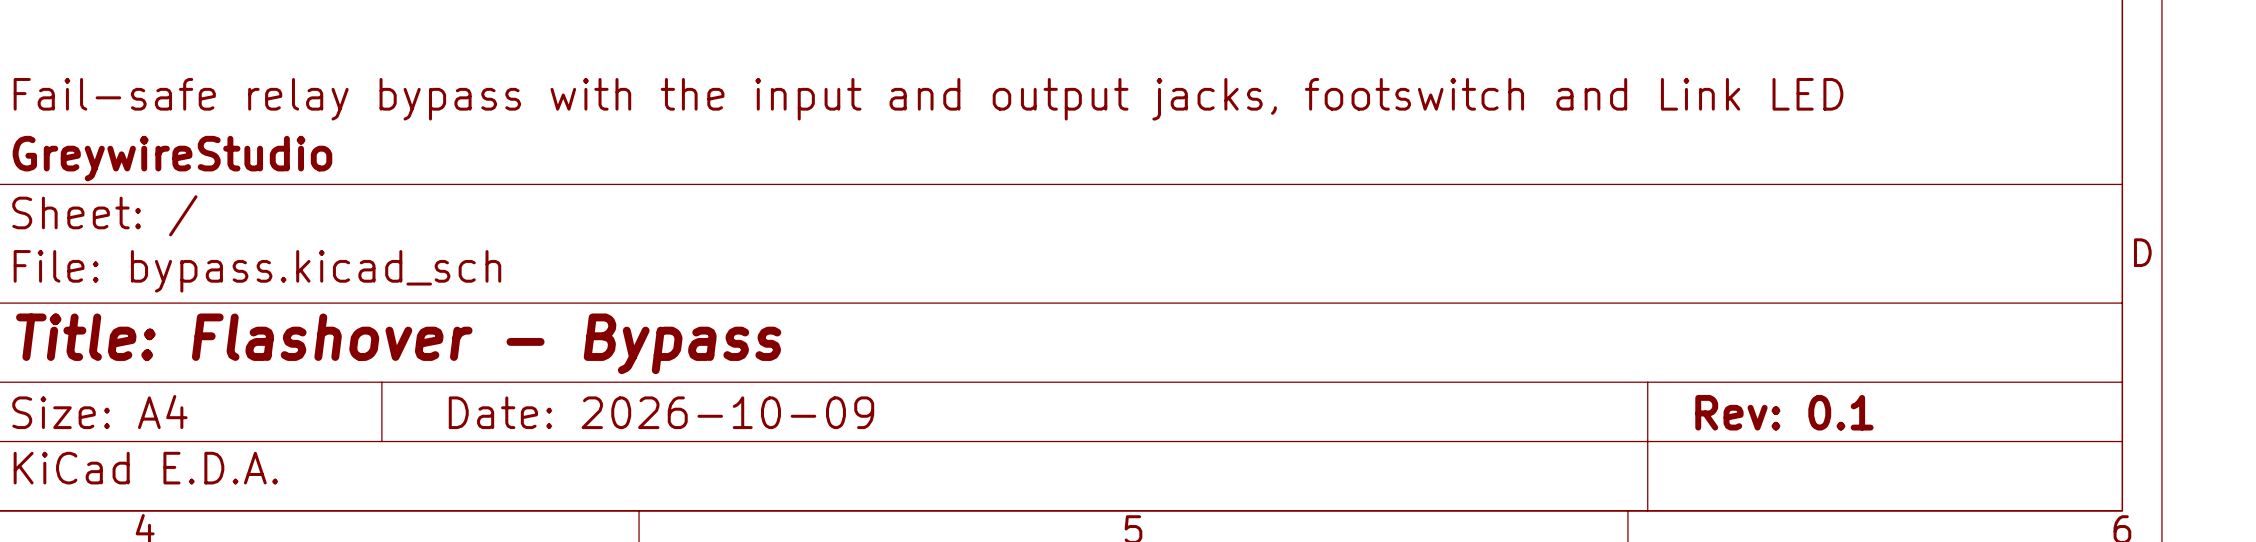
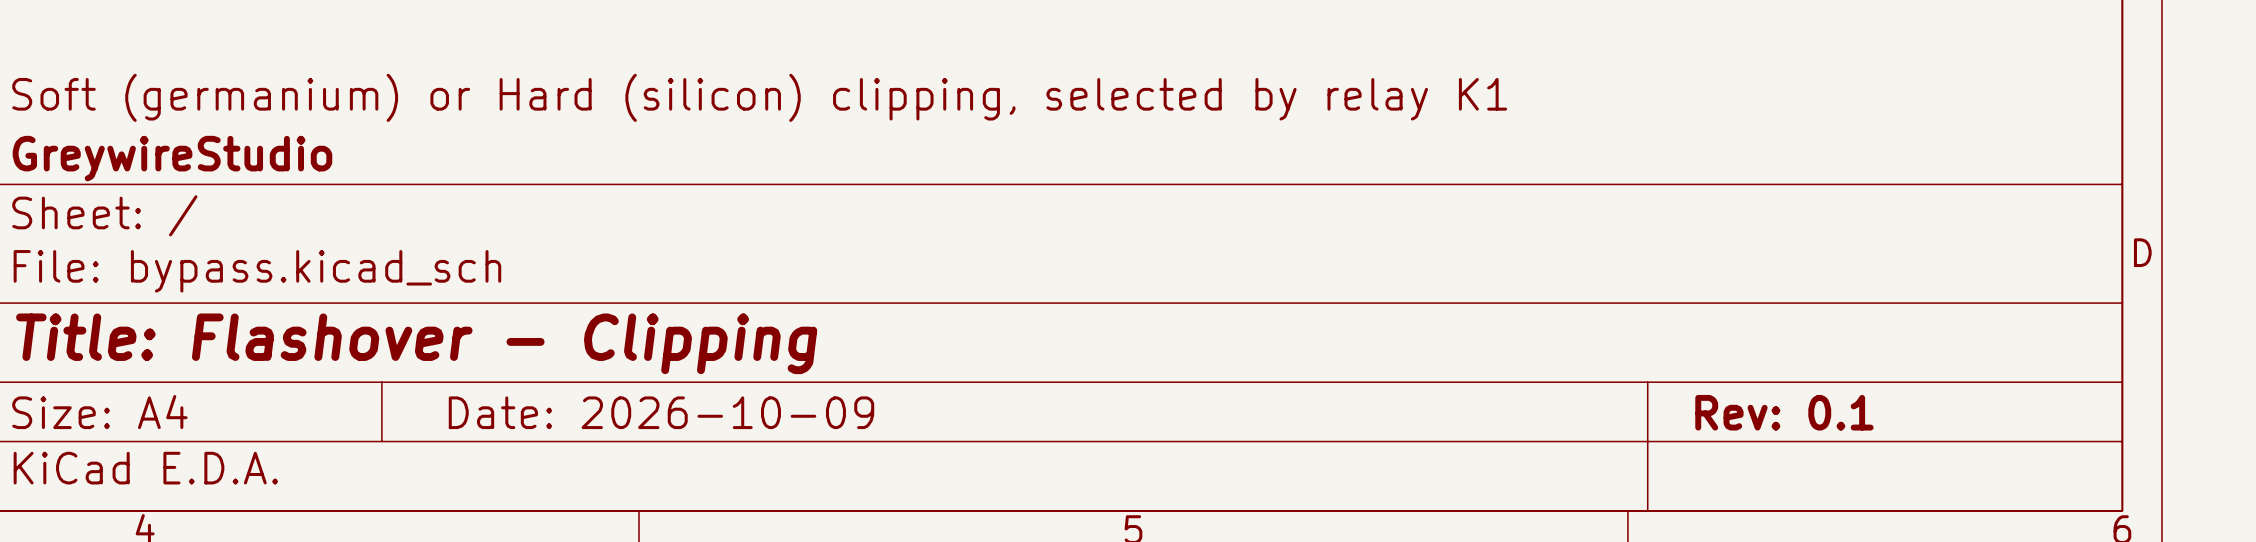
title block: Fail-safe relay bypass with the input and output jacks, footswitch and Link LED (928, 99) -> Soft (germanium) or Hard (silicon) clipping, selected by relay K1 (759, 97)
title block: Title: Flashover - Bypass (398, 343) -> Title: Flashover - Clipping (416, 343)

